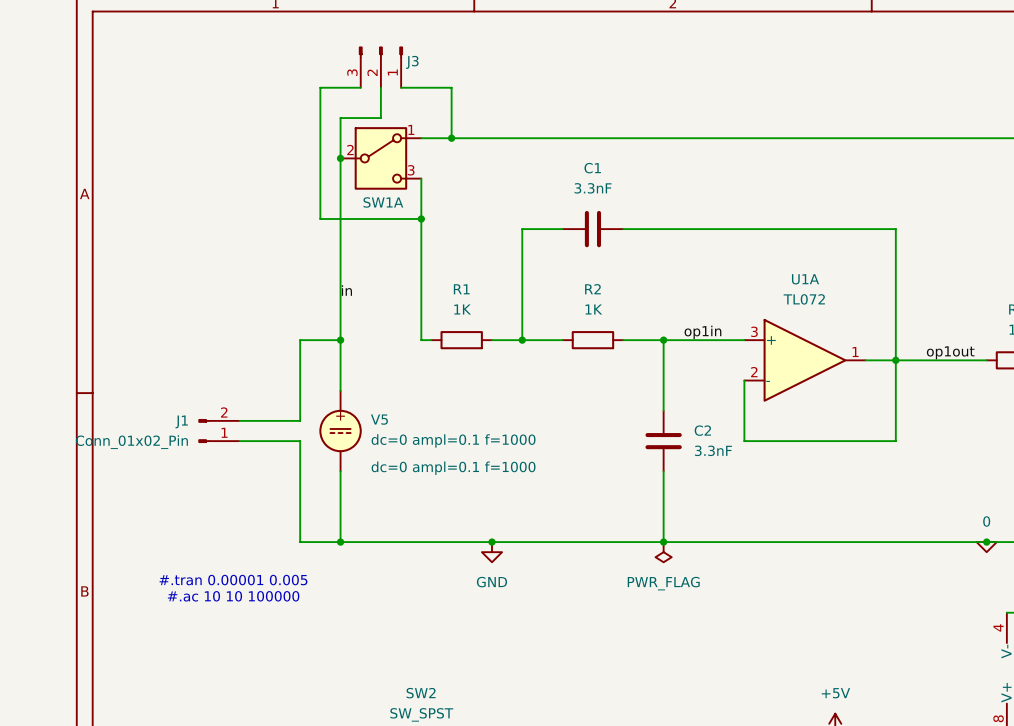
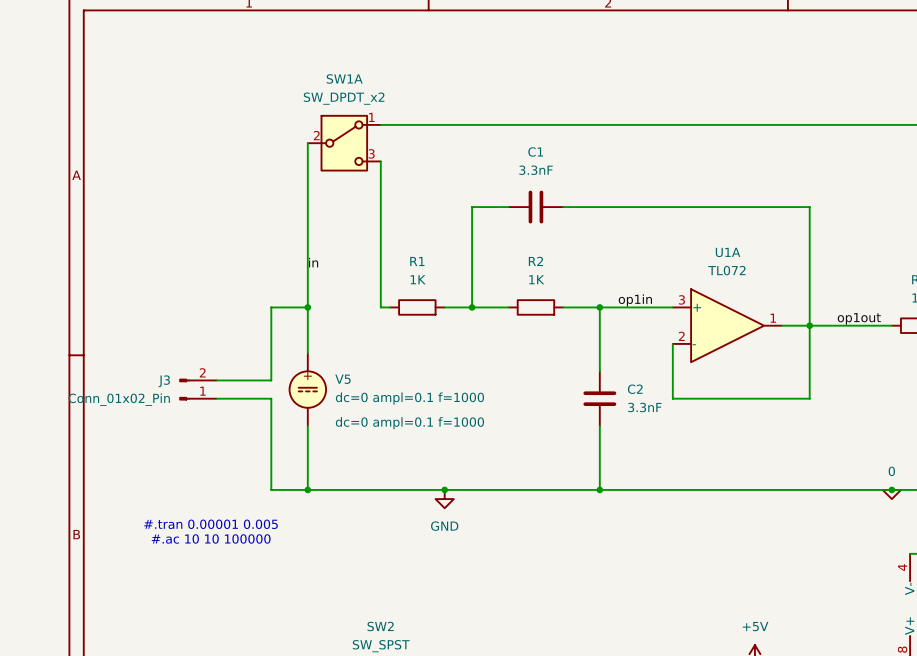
J3: (380, 67) -> none
wire: (360, 87) (320, 87) (320, 219) (421, 219) -> none
wire: (380, 87) (380, 118) (340, 118) (340, 158) -> none
wire: (401, 87) (451, 87) (451, 138) -> none
SW1A value: none -> SW_DPDT_x2 (344, 98)
junction: (451, 138) -> none
junction: (340, 158) -> none
SW1A name position: SW1A (383, 202) -> SW1A (344, 78)
junction: (421, 219) -> none
J1 name: J1 (181, 421) -> J3 (164, 381)
power symbol: PWR_FLAG (663, 552) -> none

